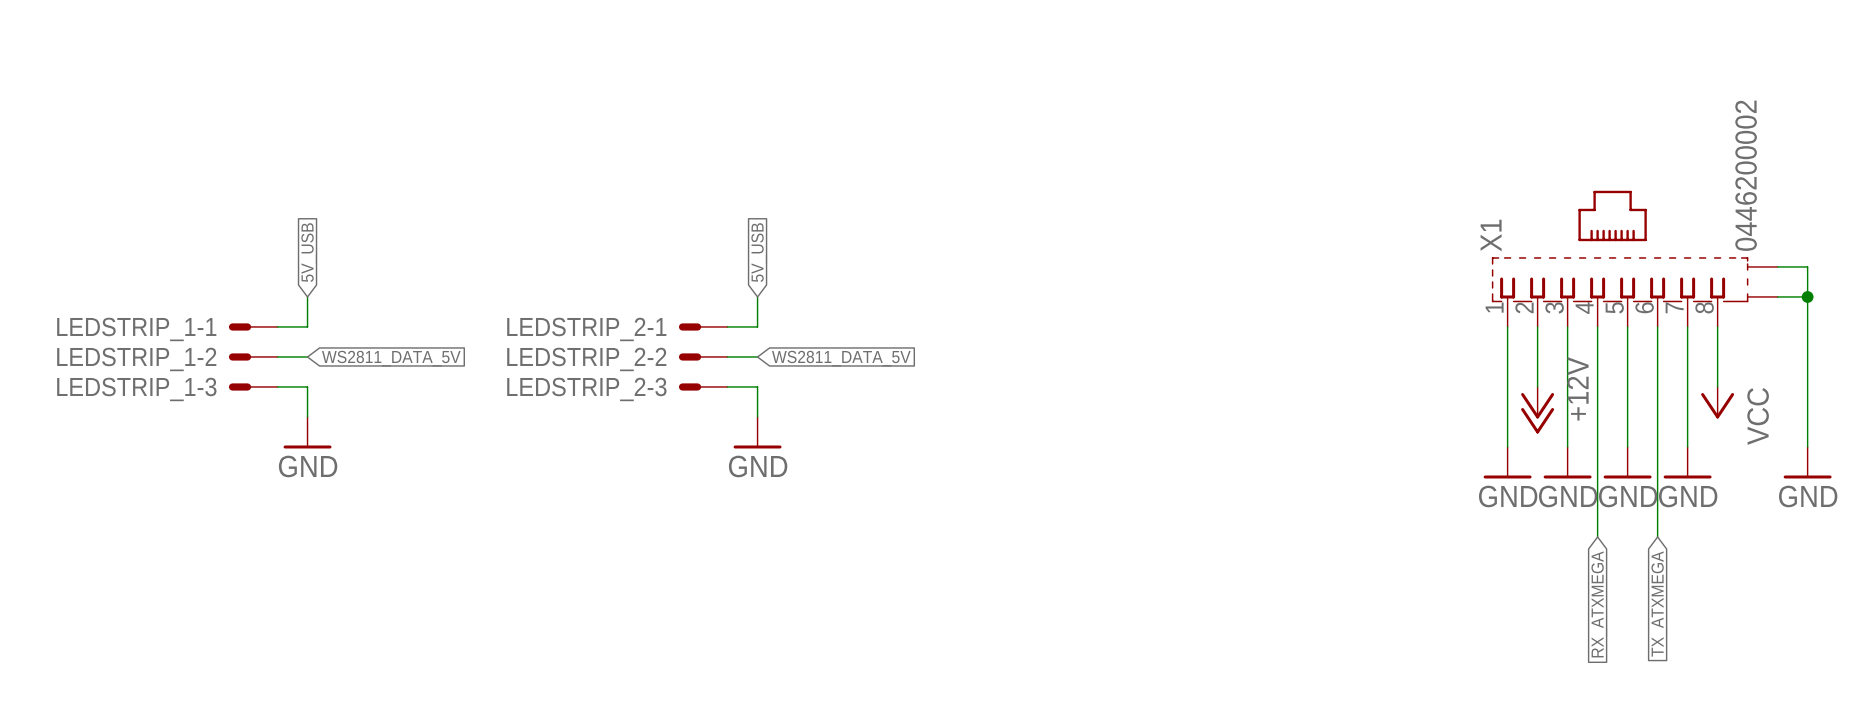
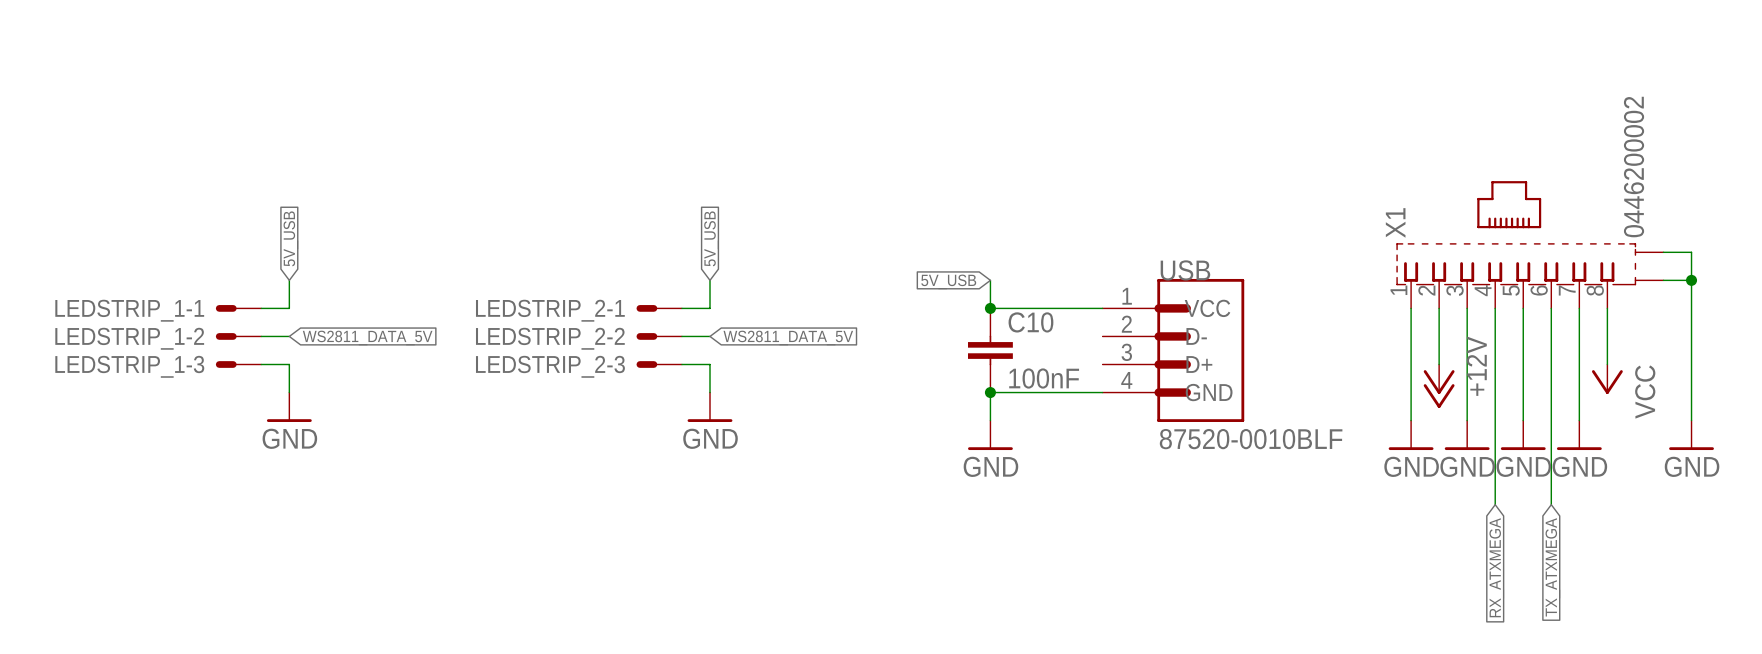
wire: none -> (990, 280) (990, 308) (1102, 308)
global label: none -> 5V_USB (948, 281)
junction: none -> (990, 308)
C10: none -> 100nF (990, 350)
USB: none -> 87520-0010BLF (1173, 350)
junction: none -> (990, 392)
wire: none -> (1102, 392) (990, 392) (990, 420)
power symbol: none -> GND (990, 435)

